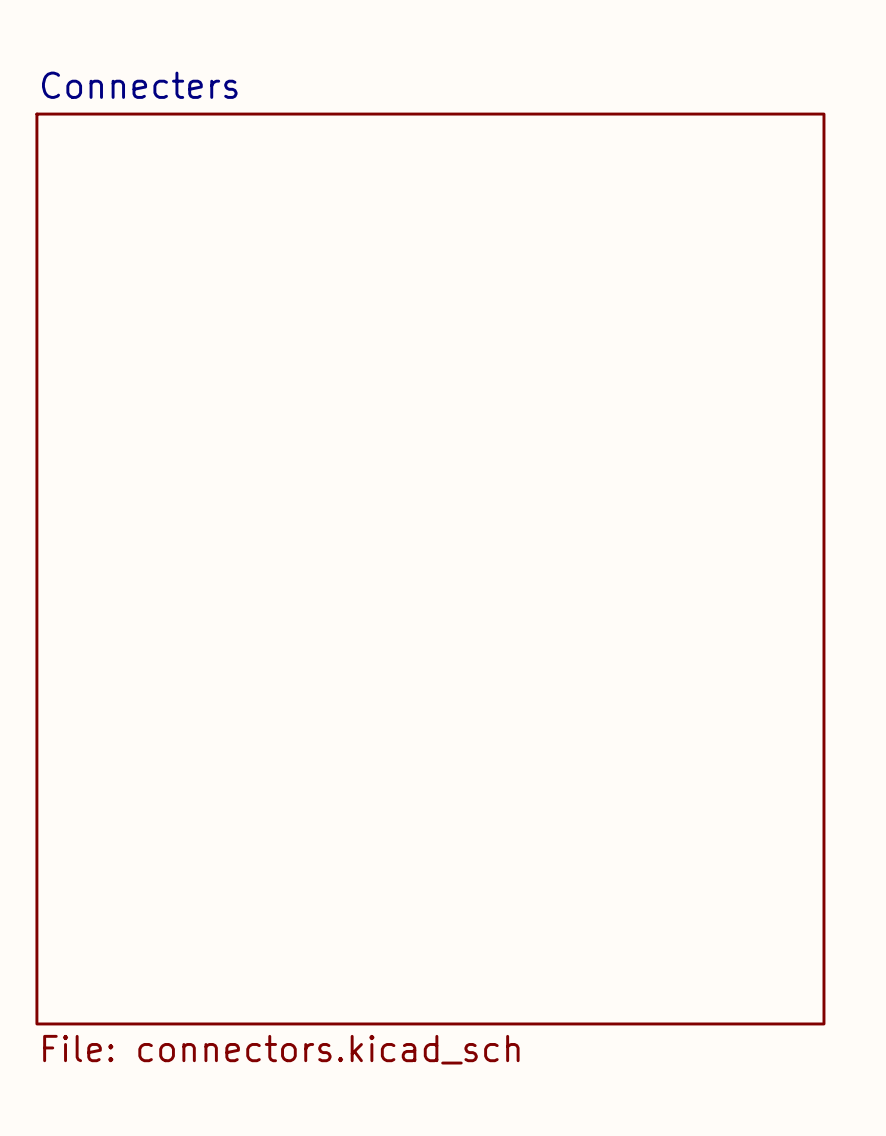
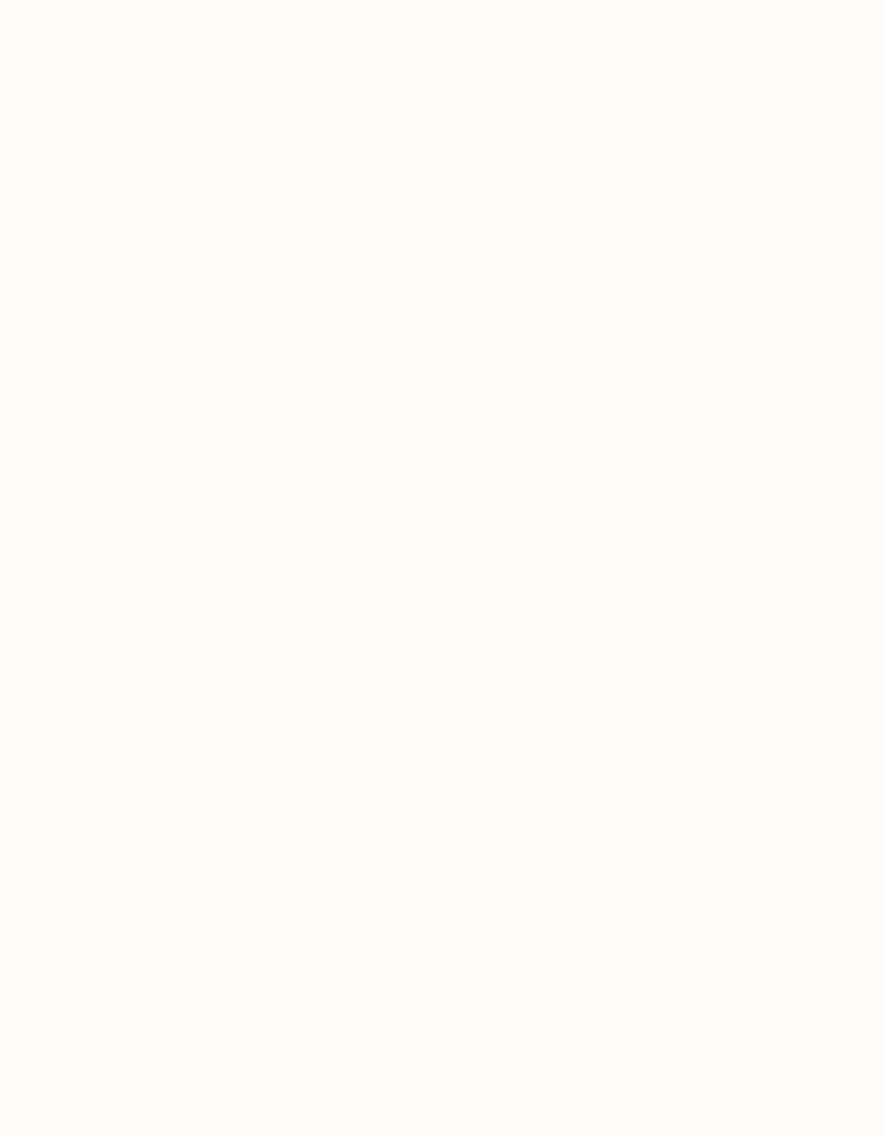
sheet Connecters: File: connectors.kicad_sch (430, 569) -> none

